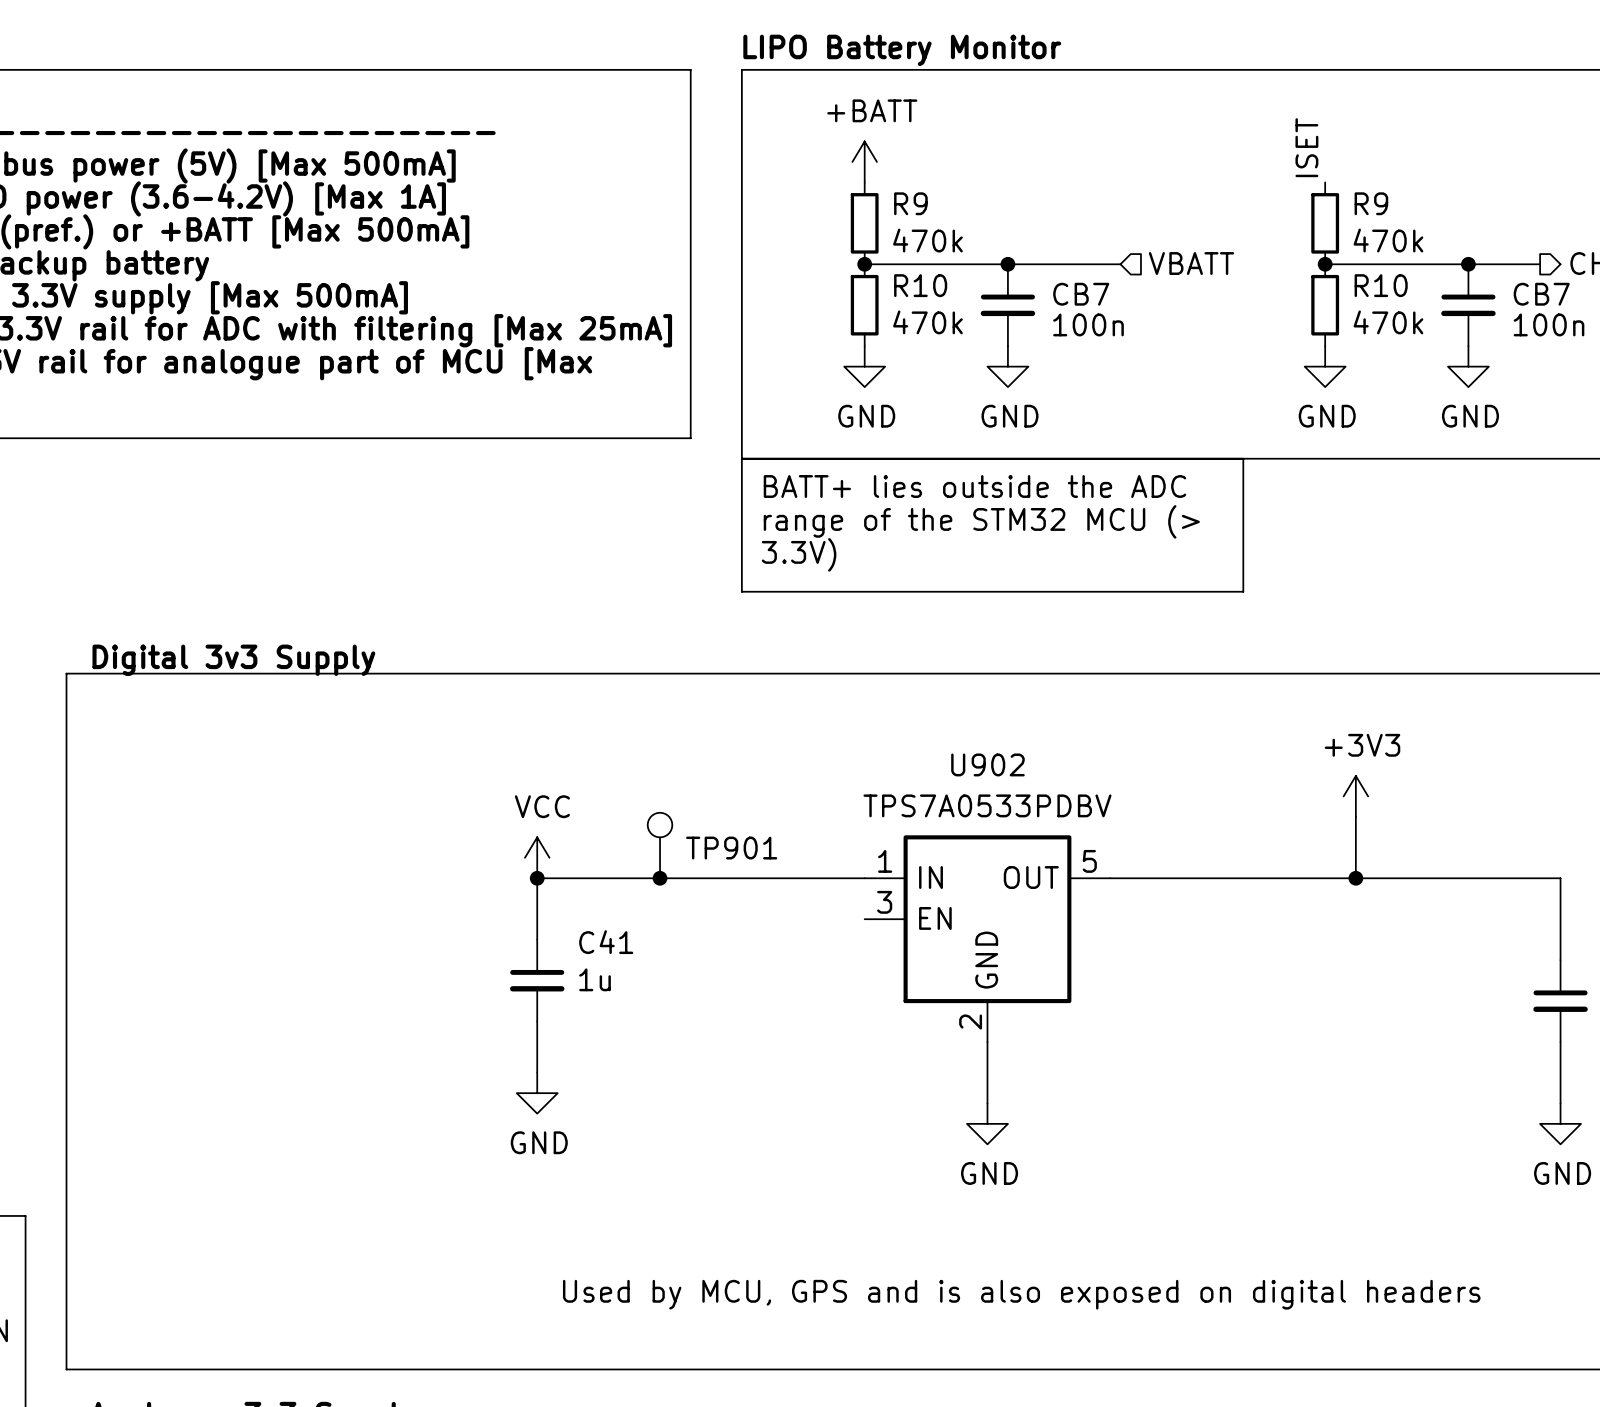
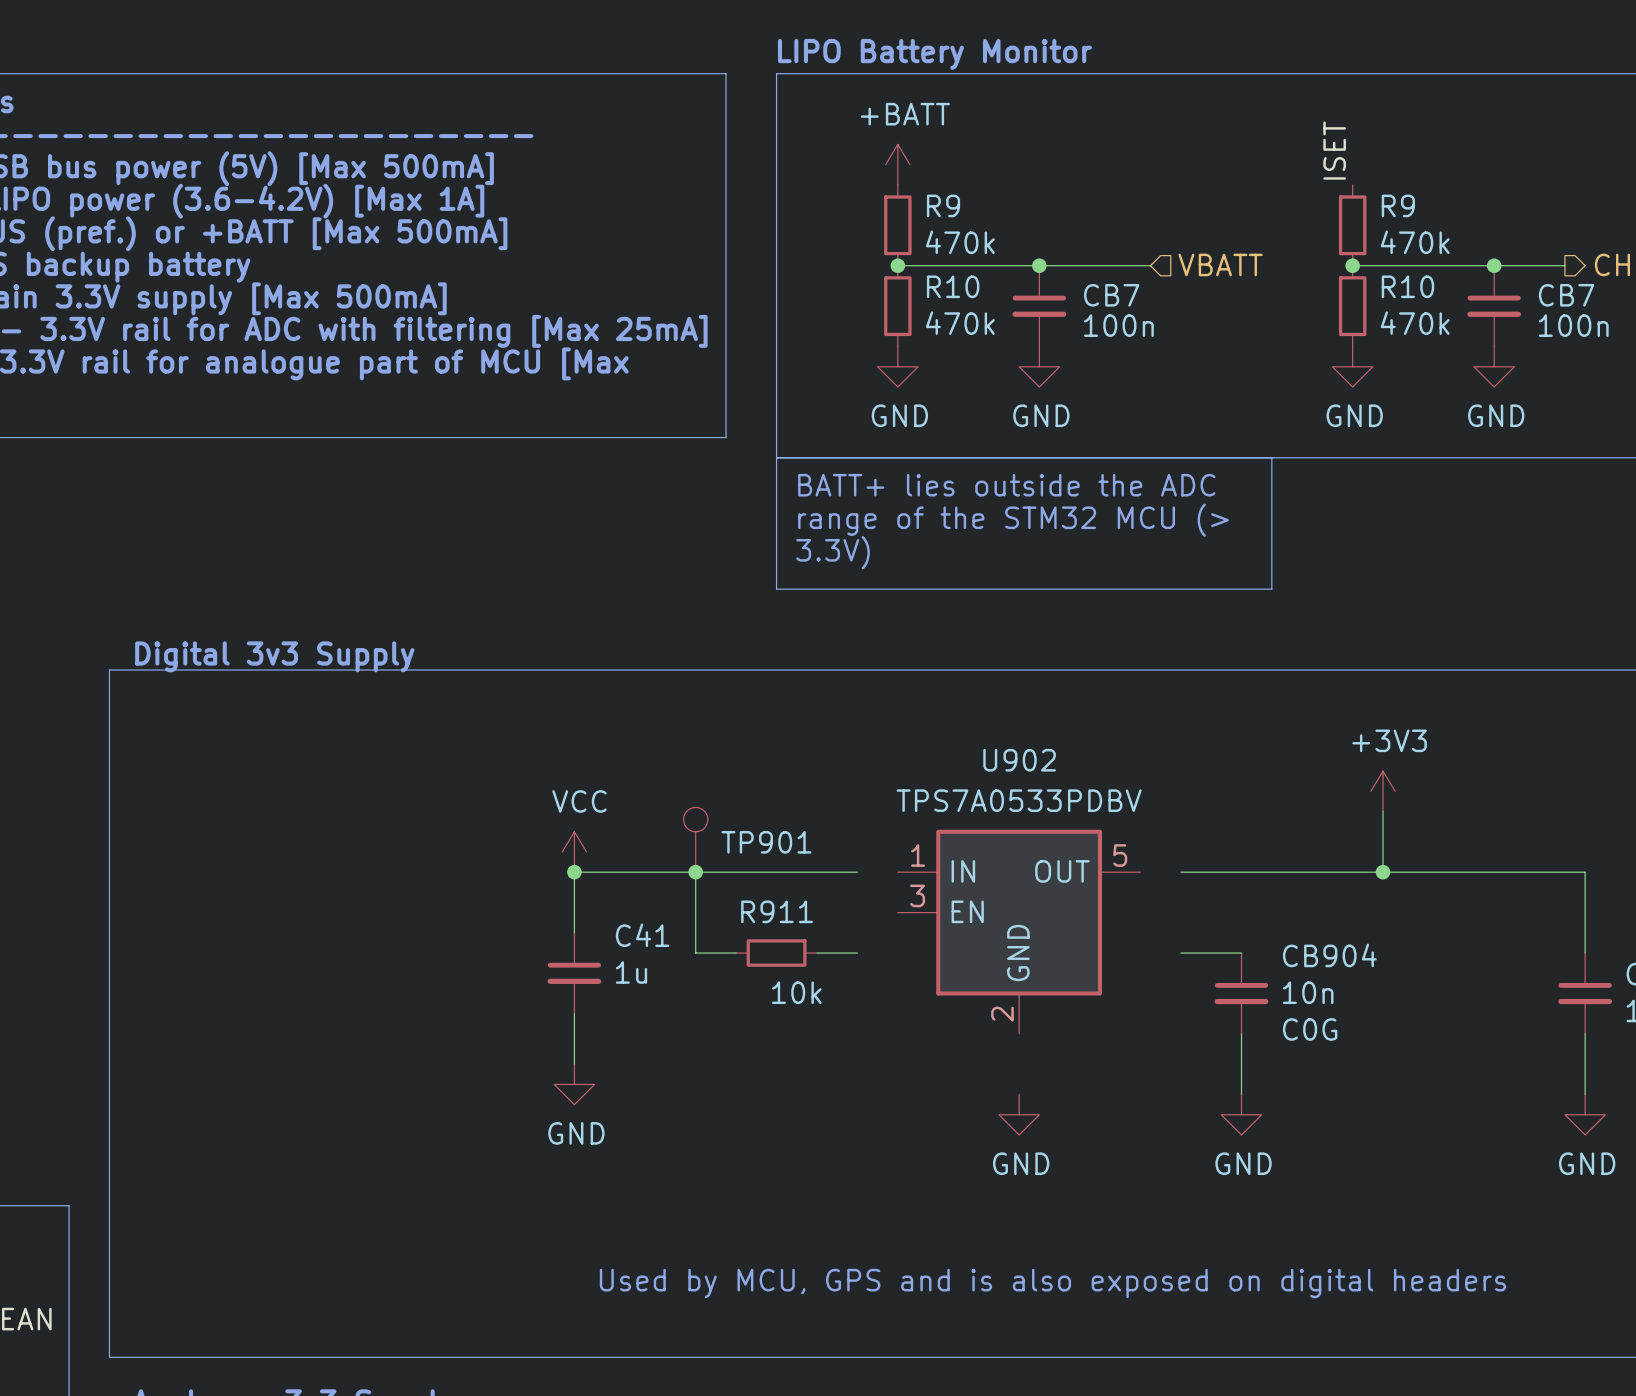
wire: none -> (695, 872) (695, 953) (736, 953)
wire: (823, 878) (864, 878) -> (816, 953) (857, 953)
wire: (1110, 878) (1151, 878) -> none
R911: none -> 10k (776, 953)
wire: none -> (1180, 953) (1241, 953)
CB904: none -> 10n (1241, 993)
wire: (987, 1042) (987, 1103) -> (1241, 1033) (1241, 1094)
power symbol: none -> GND (1241, 1114)

